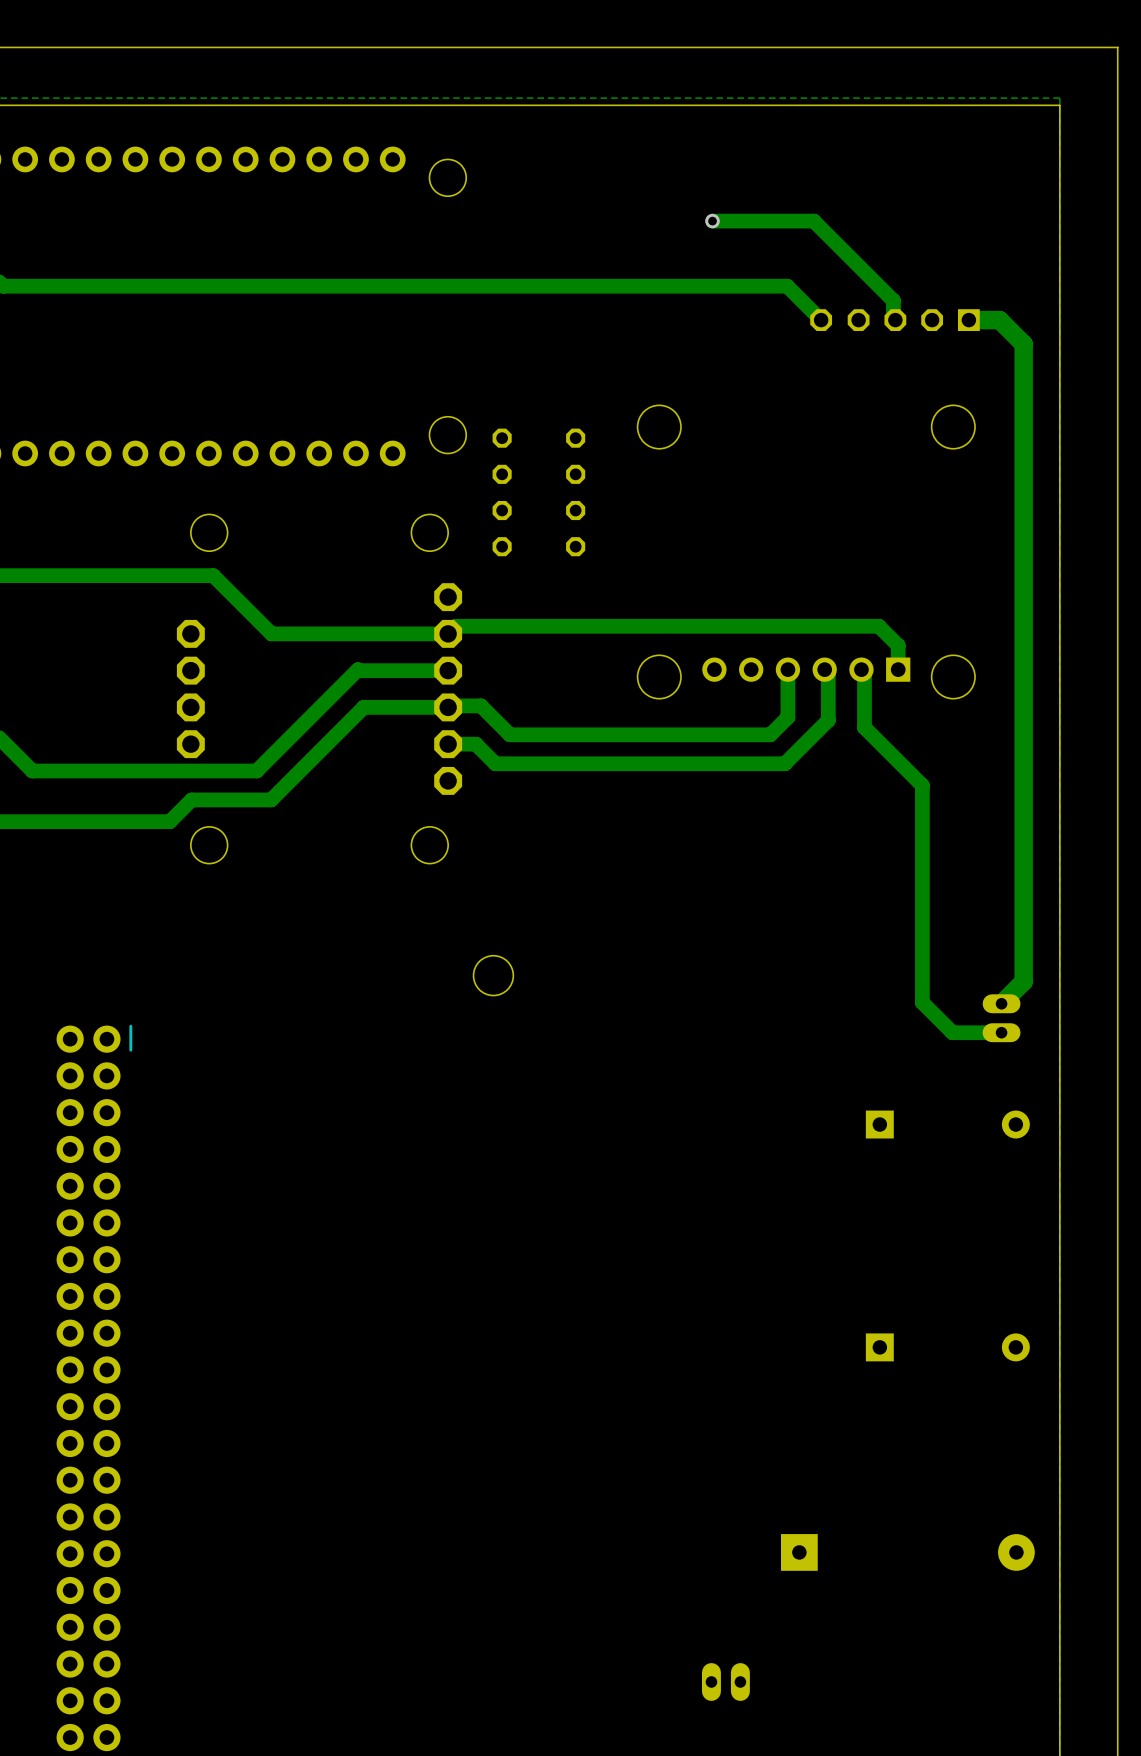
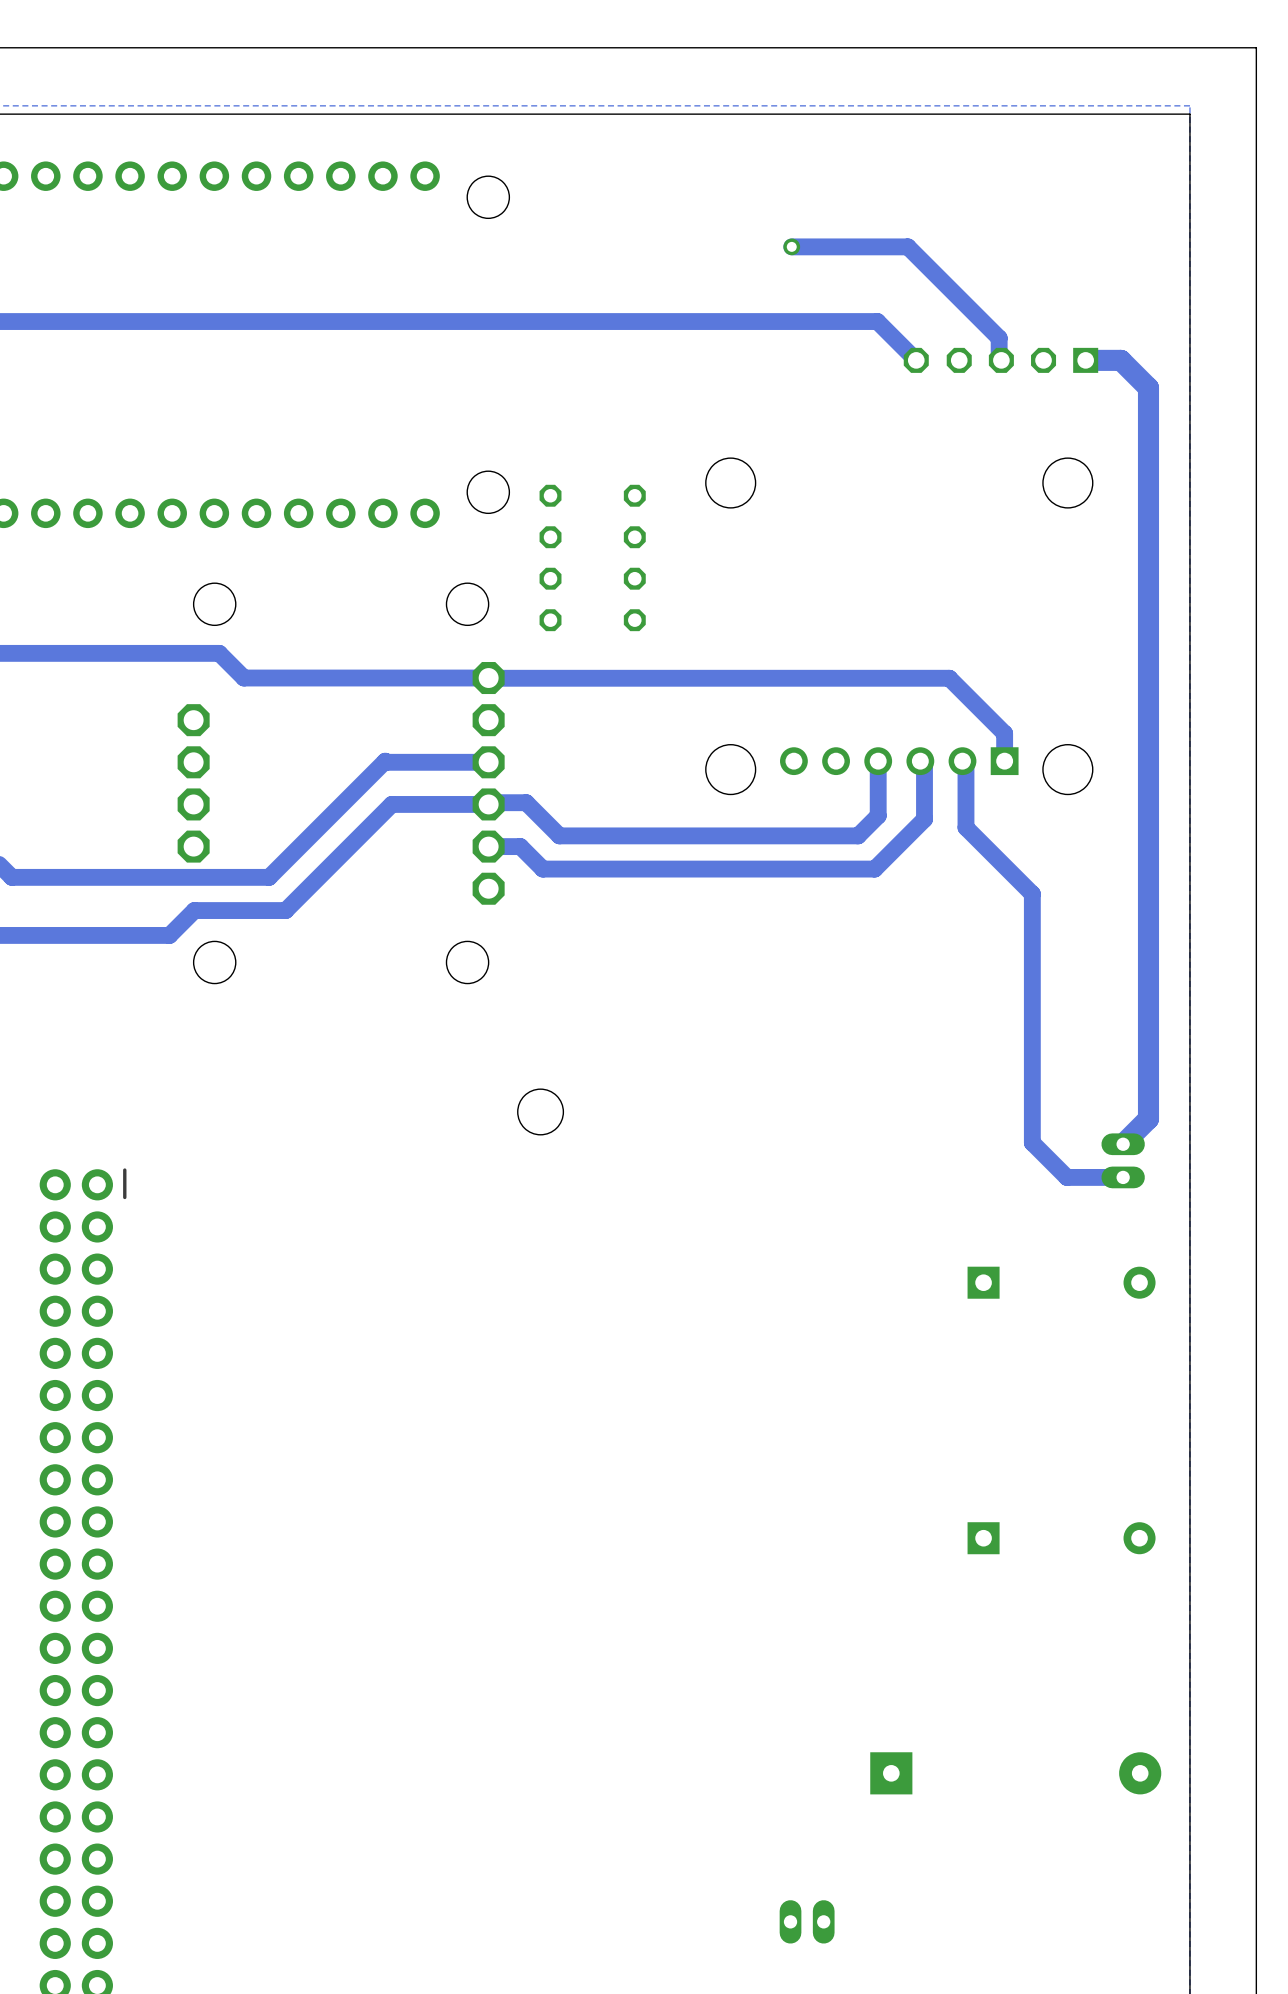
track: (234, 597) (271, 633) (448, 633) (455, 626) (878, 626) -> (243, 678) (949, 678) (982, 711)

